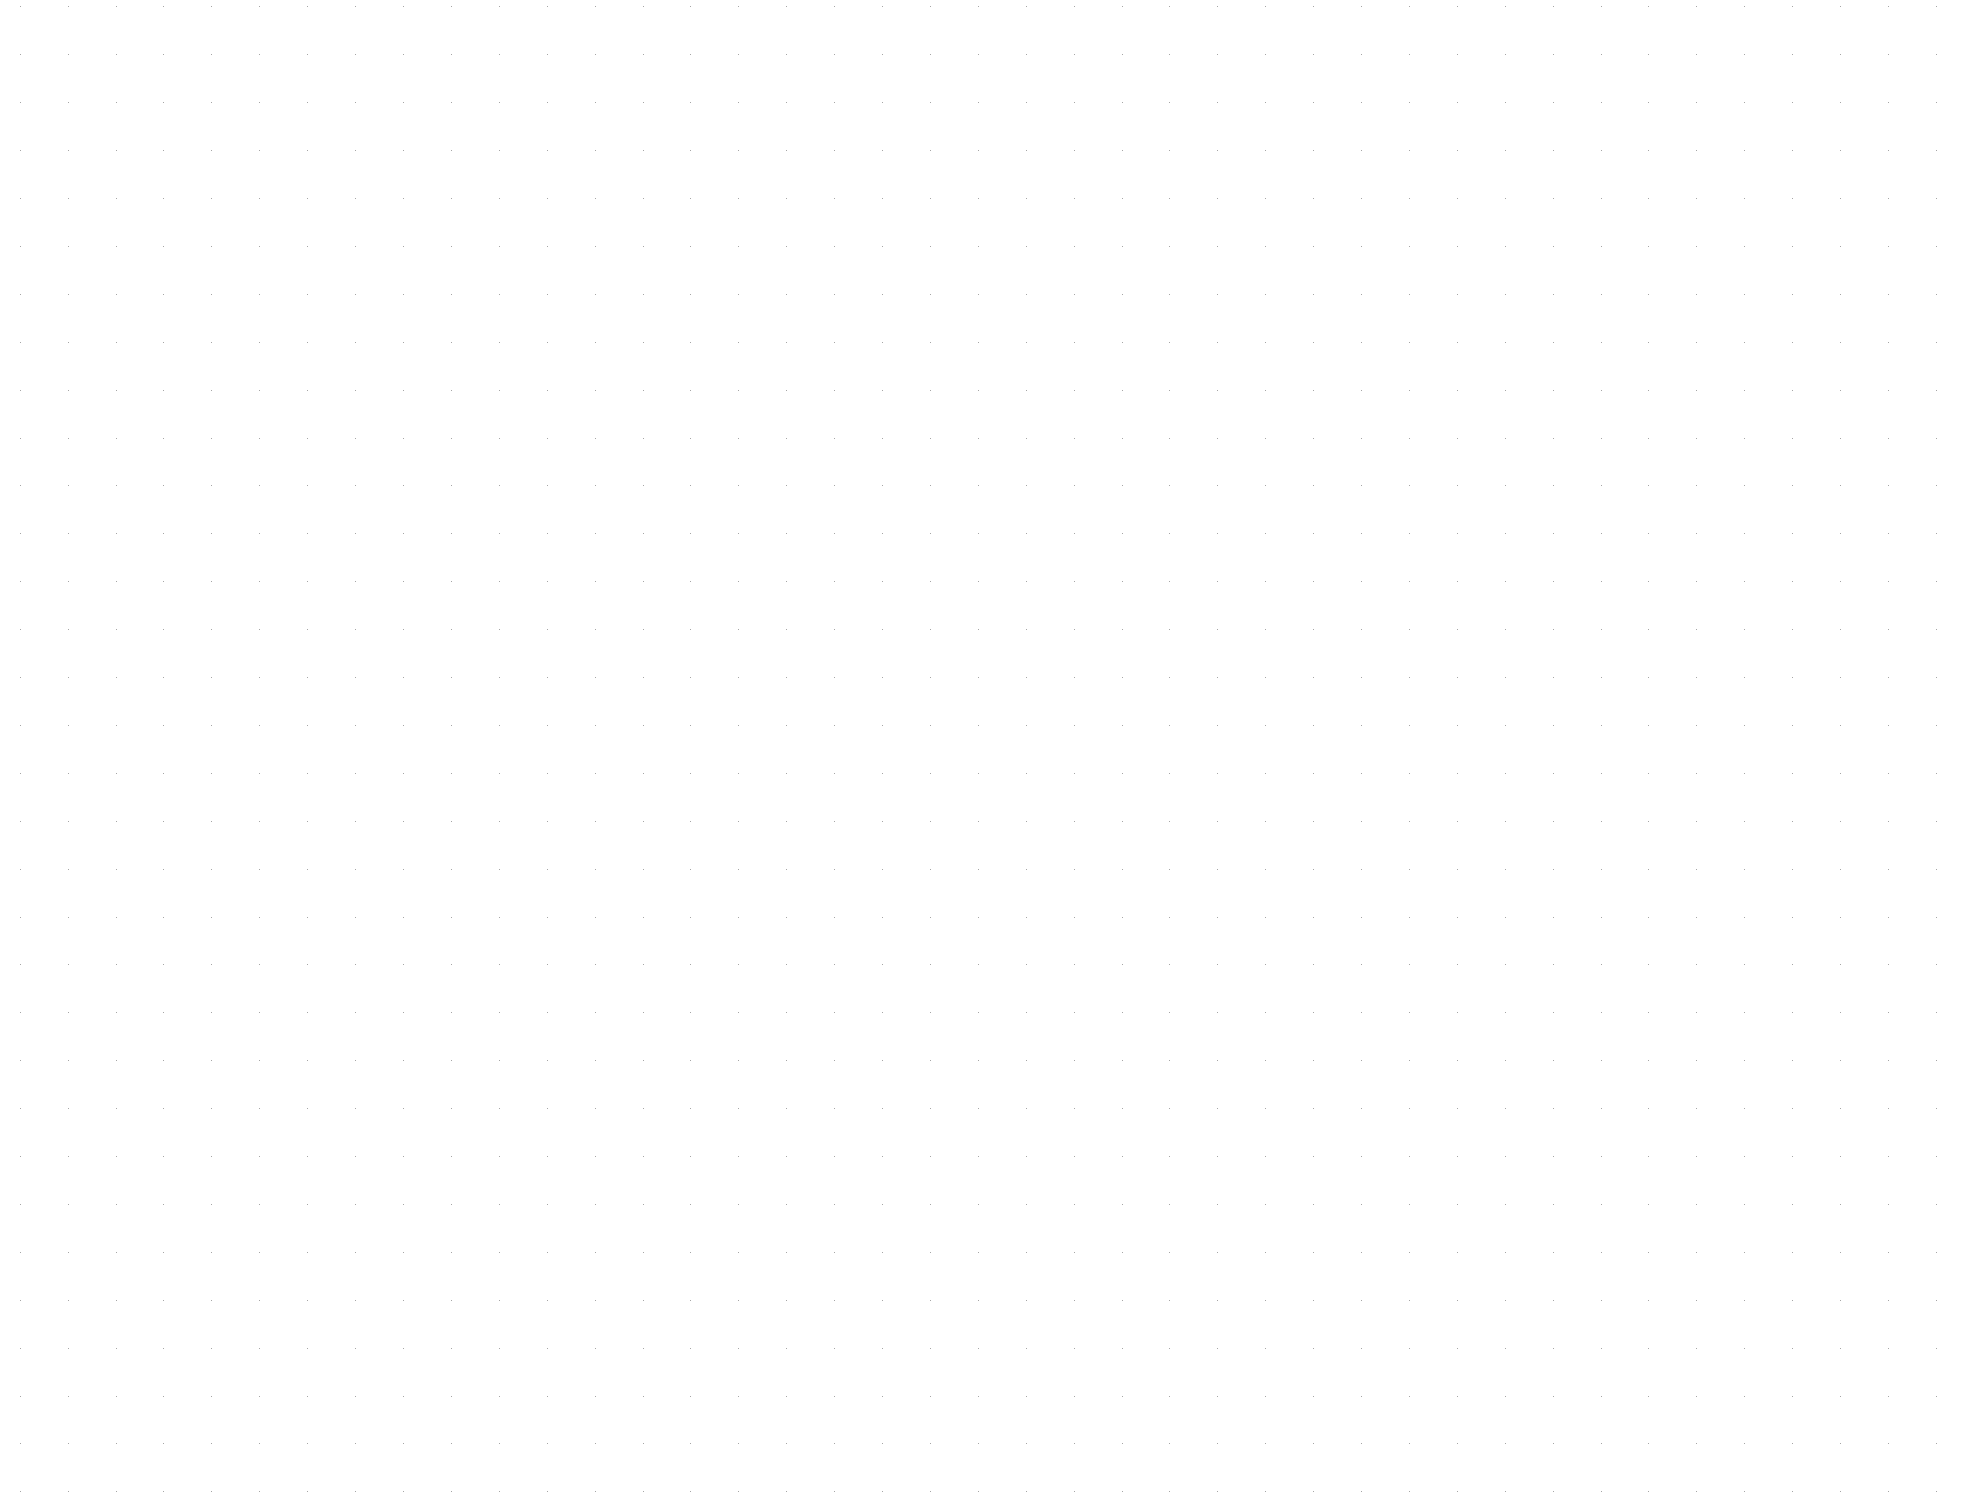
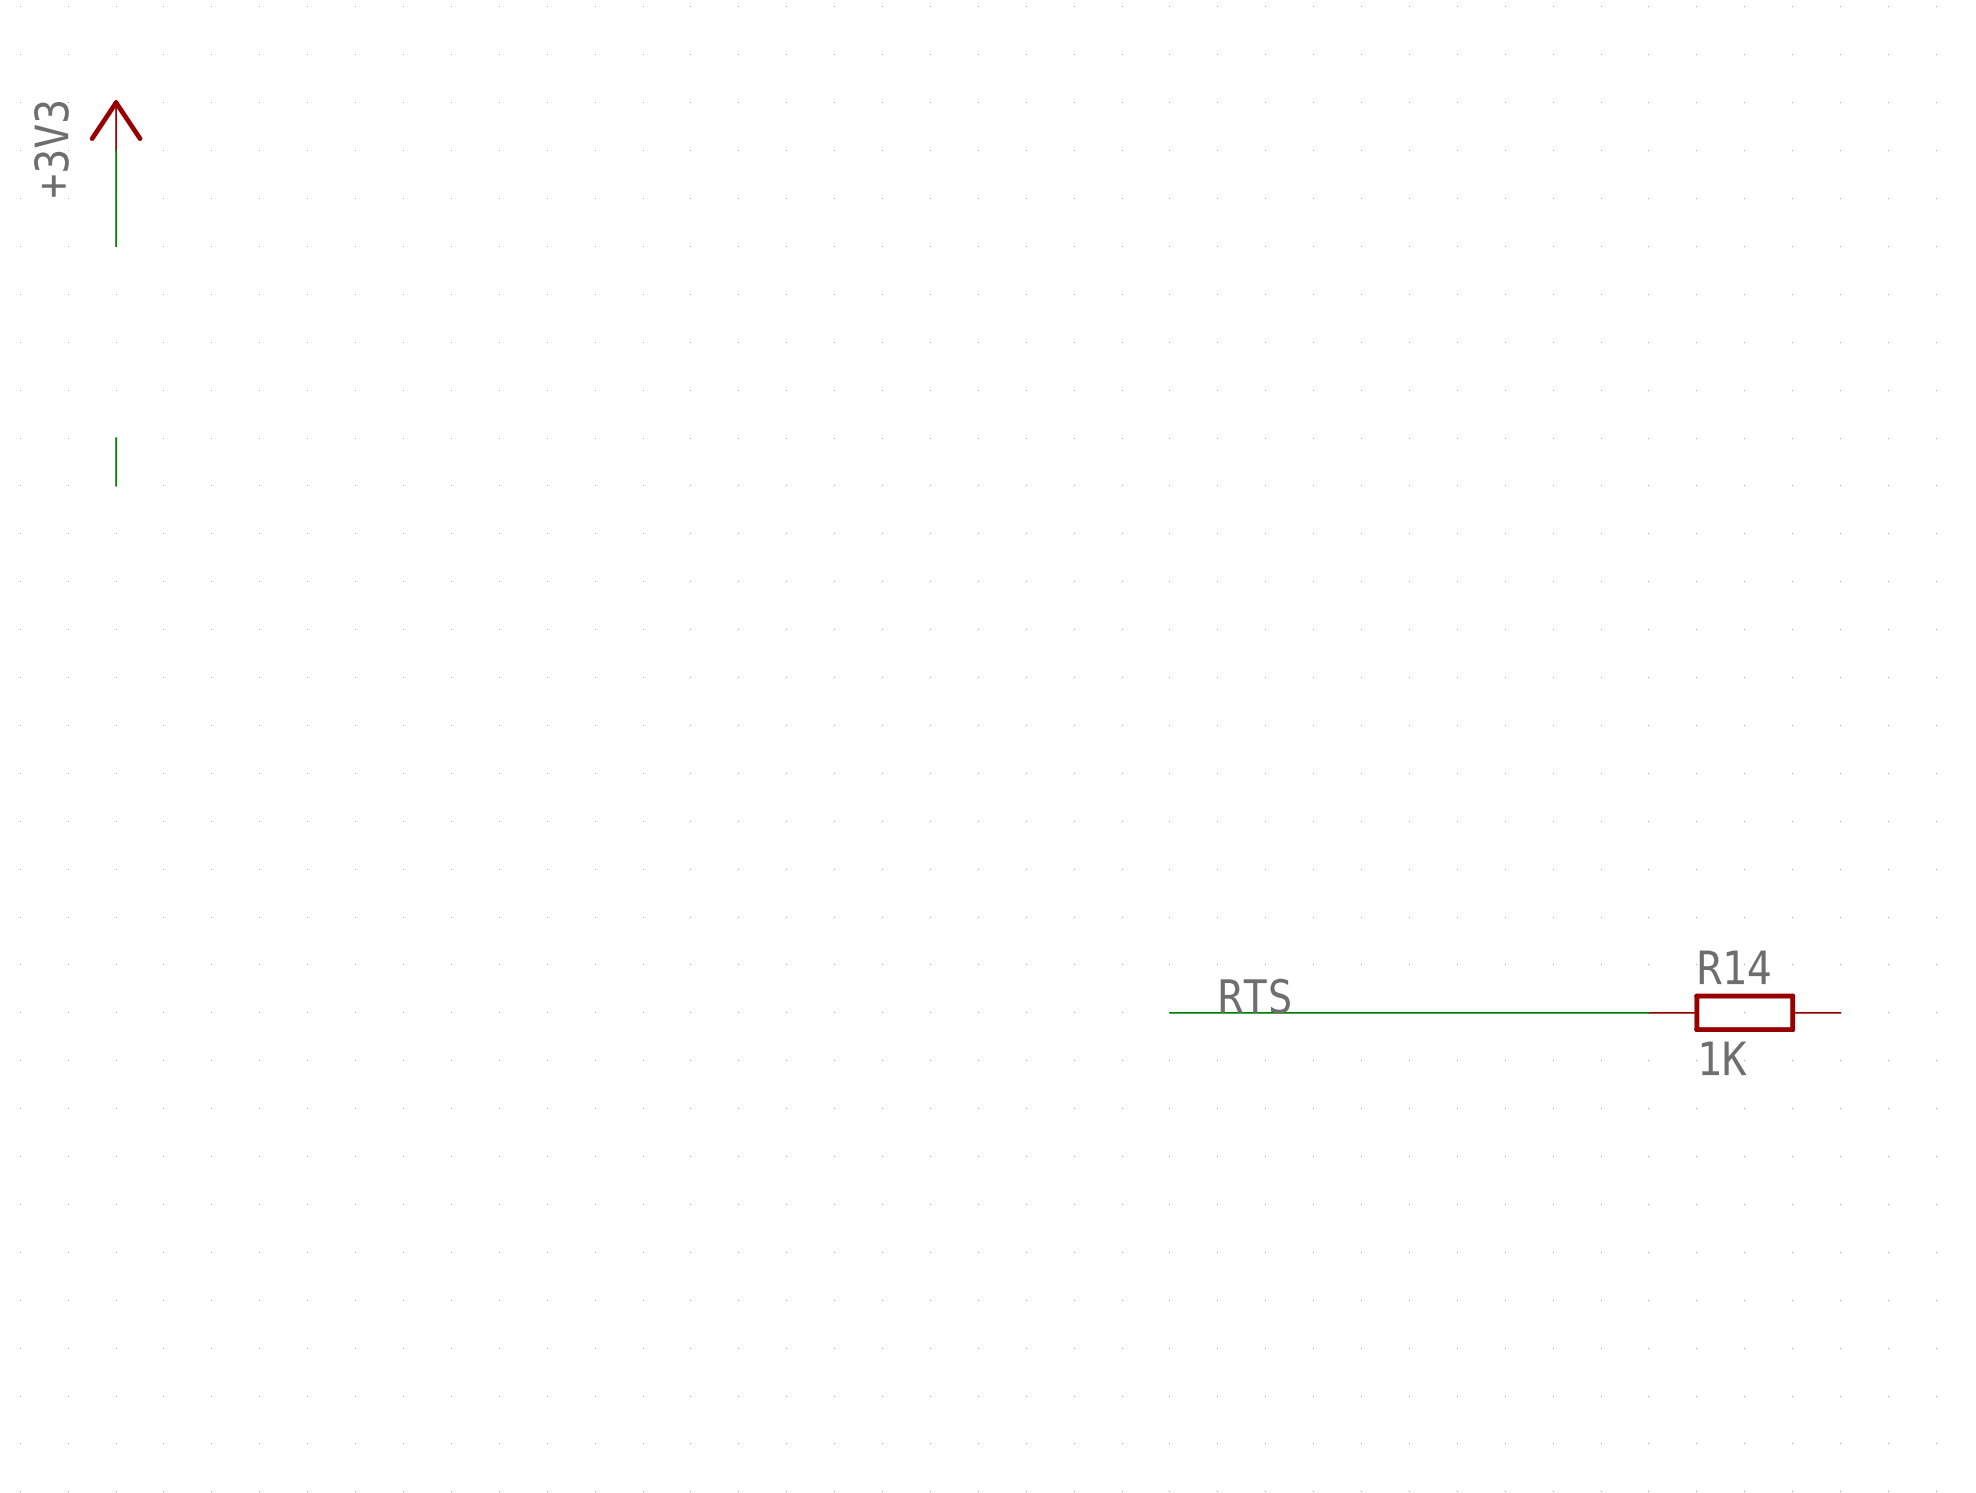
power symbol: none -> +3V3 (116, 125)
wire: none -> (116, 150) (116, 246)
wire: none -> (116, 438) (116, 485)
label: none -> RTS (1255, 996)
wire: none -> (1169, 1012) (1648, 1012)
R14: none -> 1K (1744, 1012)

